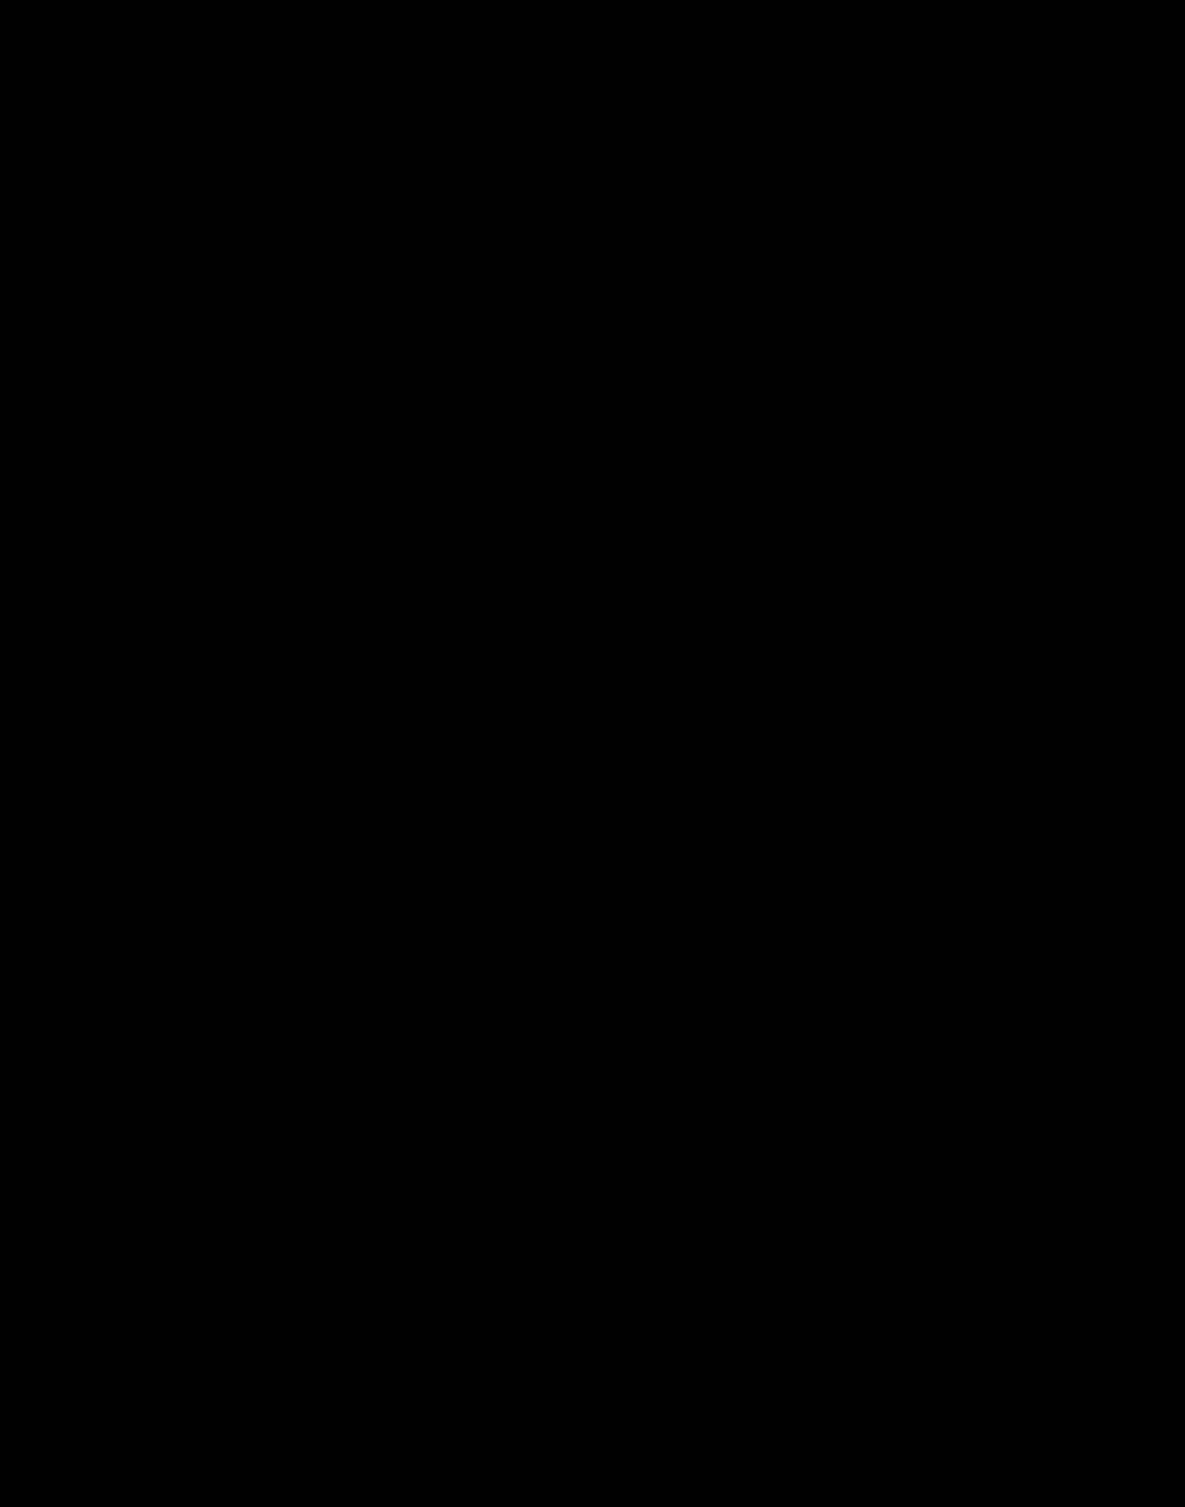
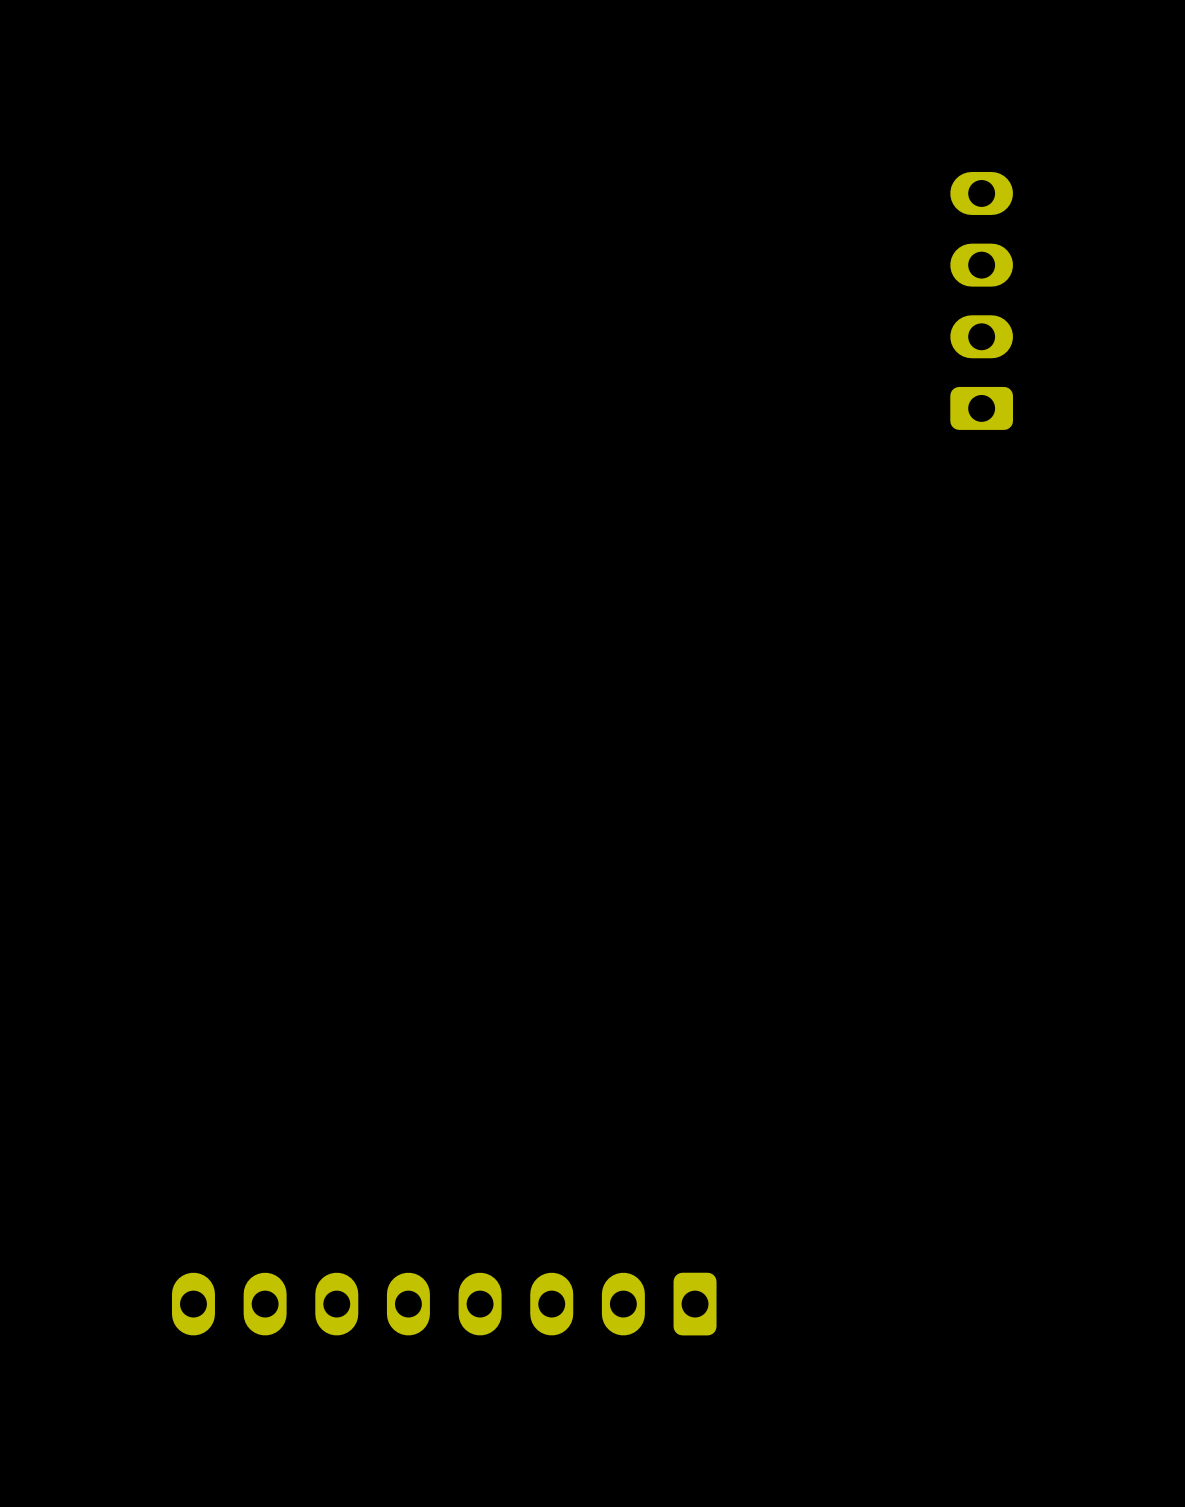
part: none -> (981, 300)
part: none -> (444, 1304)

